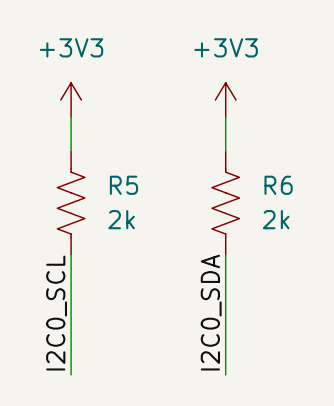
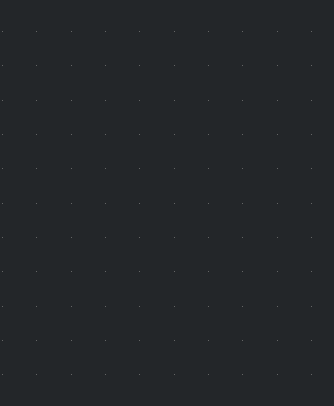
power symbol: +3V3 (71, 100) -> none
power symbol: +3V3 (225, 100) -> none
wire: (71, 117) (71, 151) -> none
wire: (225, 117) (225, 151) -> none
R5: 2k (71, 203) -> none
R6: 2k (225, 203) -> none
wire: (71, 254) (71, 374) -> none
wire: (225, 254) (225, 374) -> none
label: I2C0_SDA (211, 312) -> none
label: I2C0_SCL (56, 313) -> none

